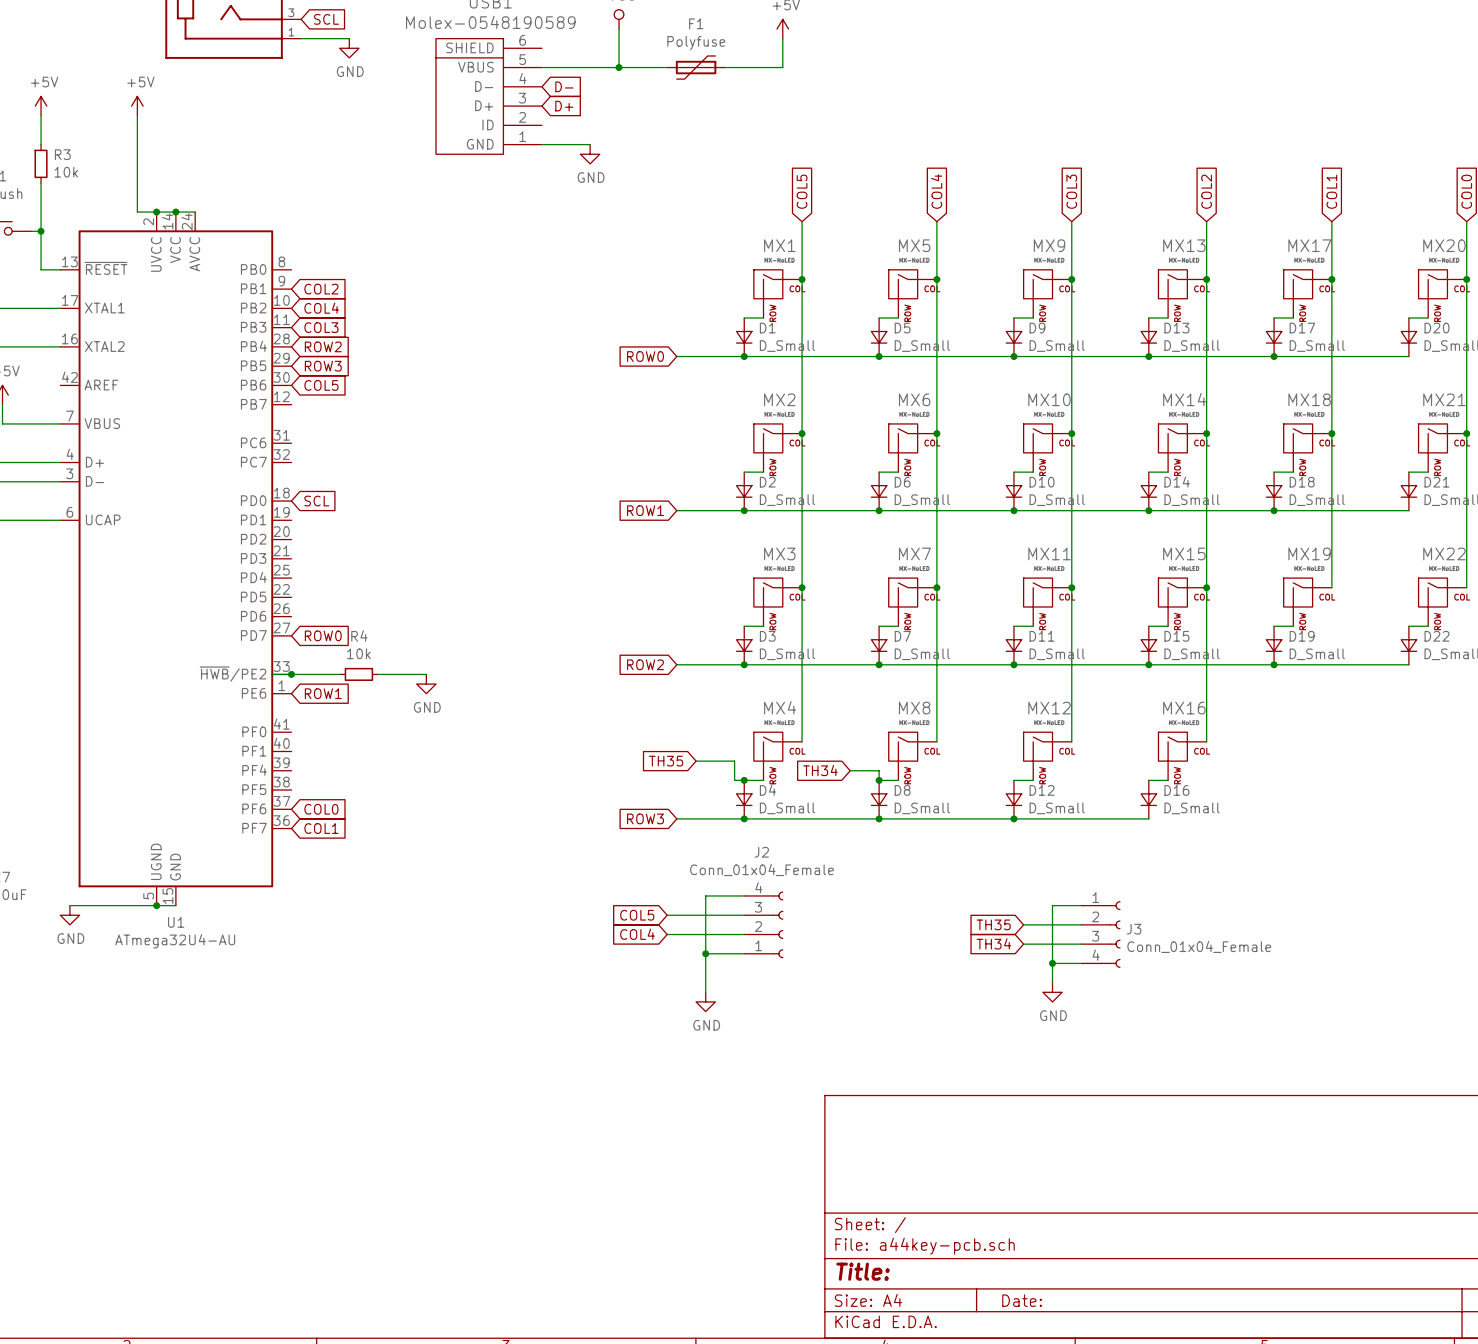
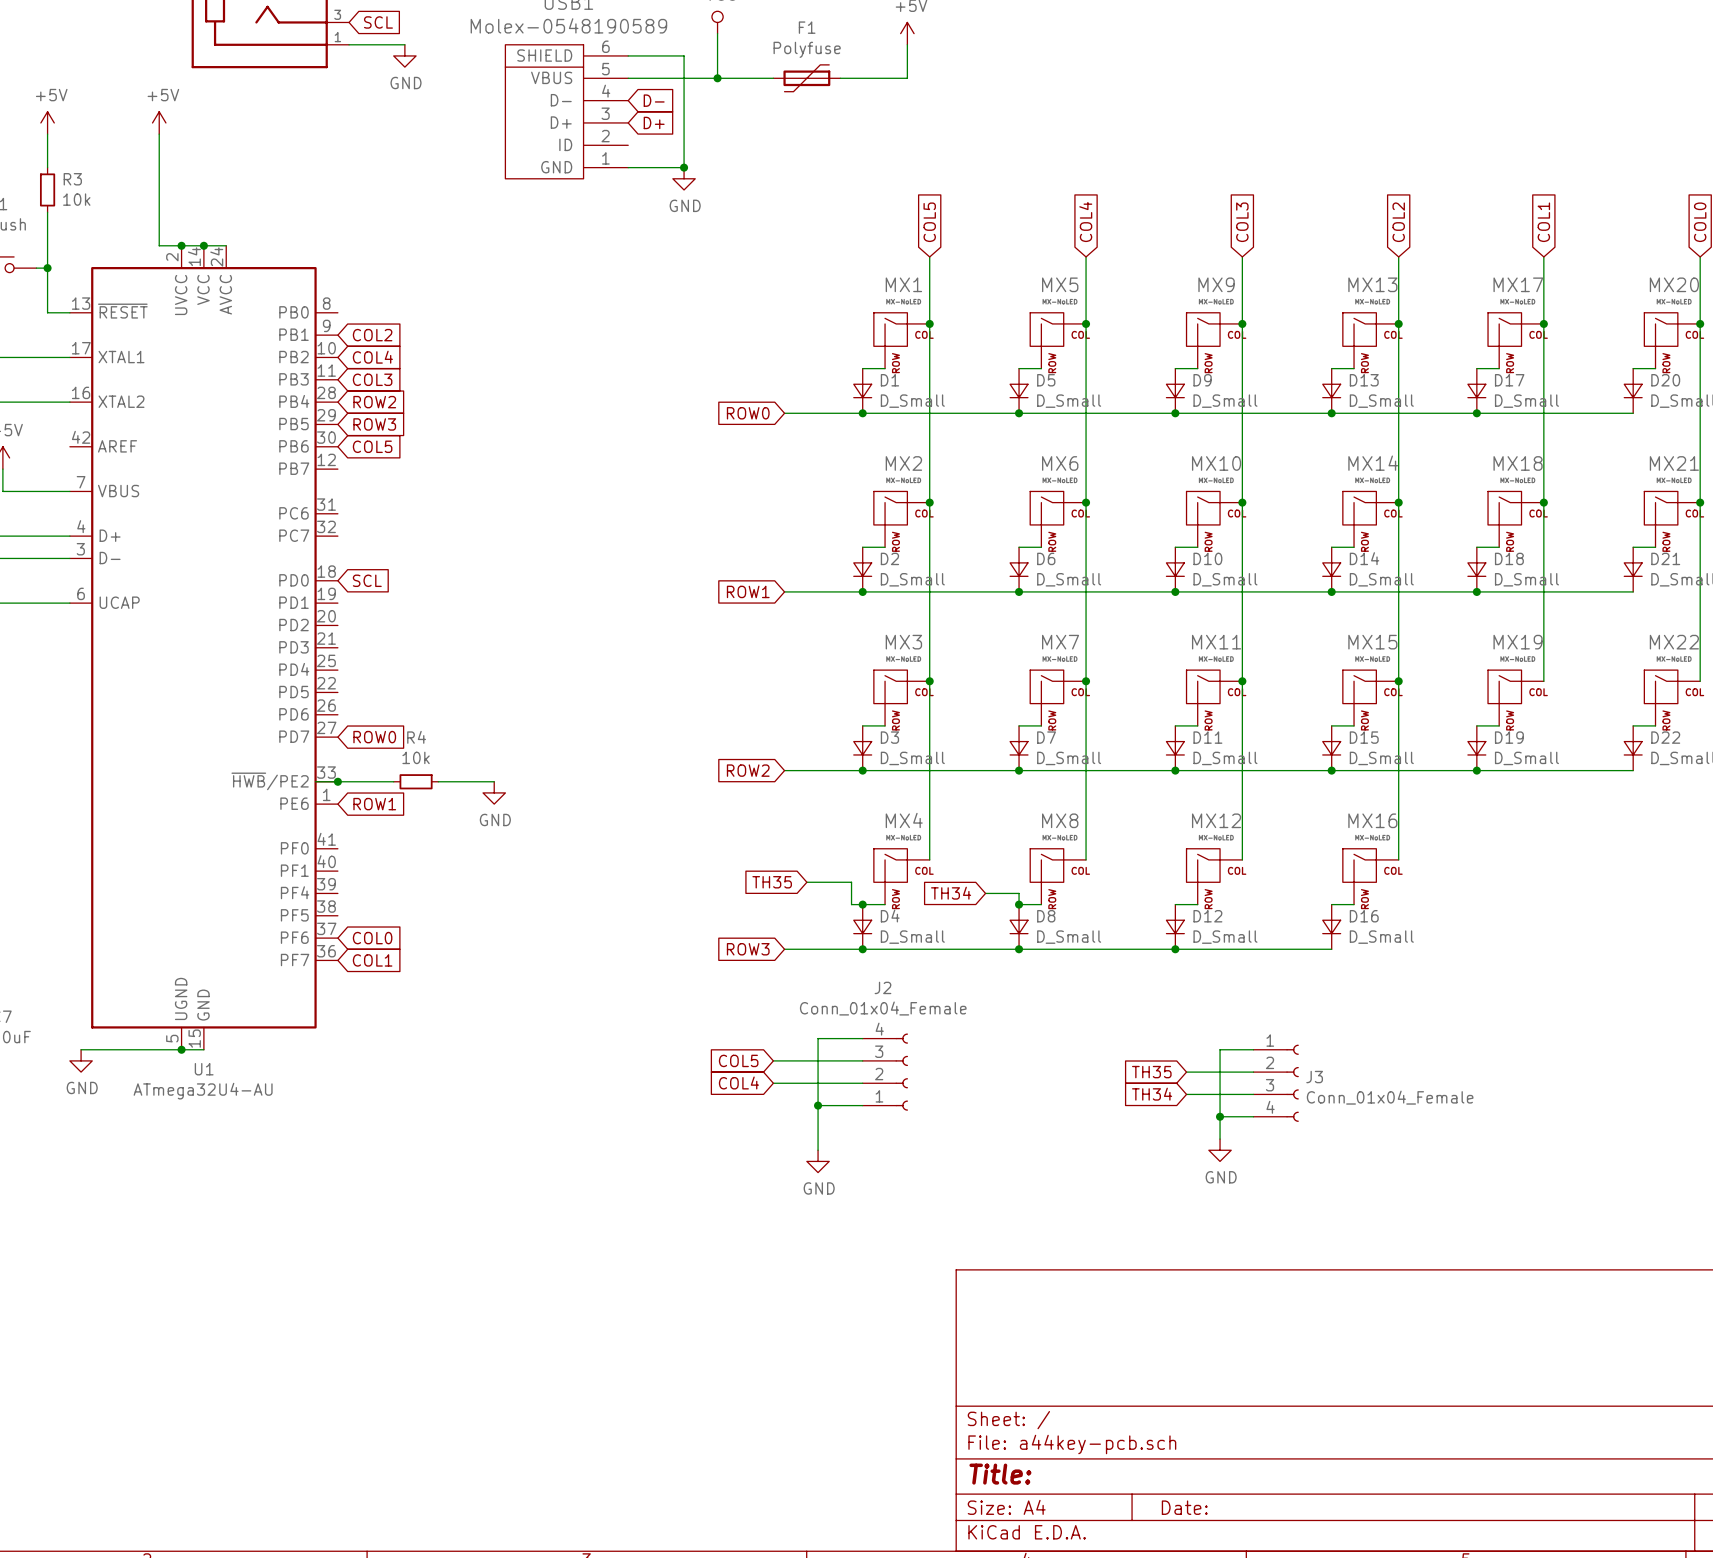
wire: none -> (628, 55) (684, 55) (684, 167)
junction: none -> (684, 167)

